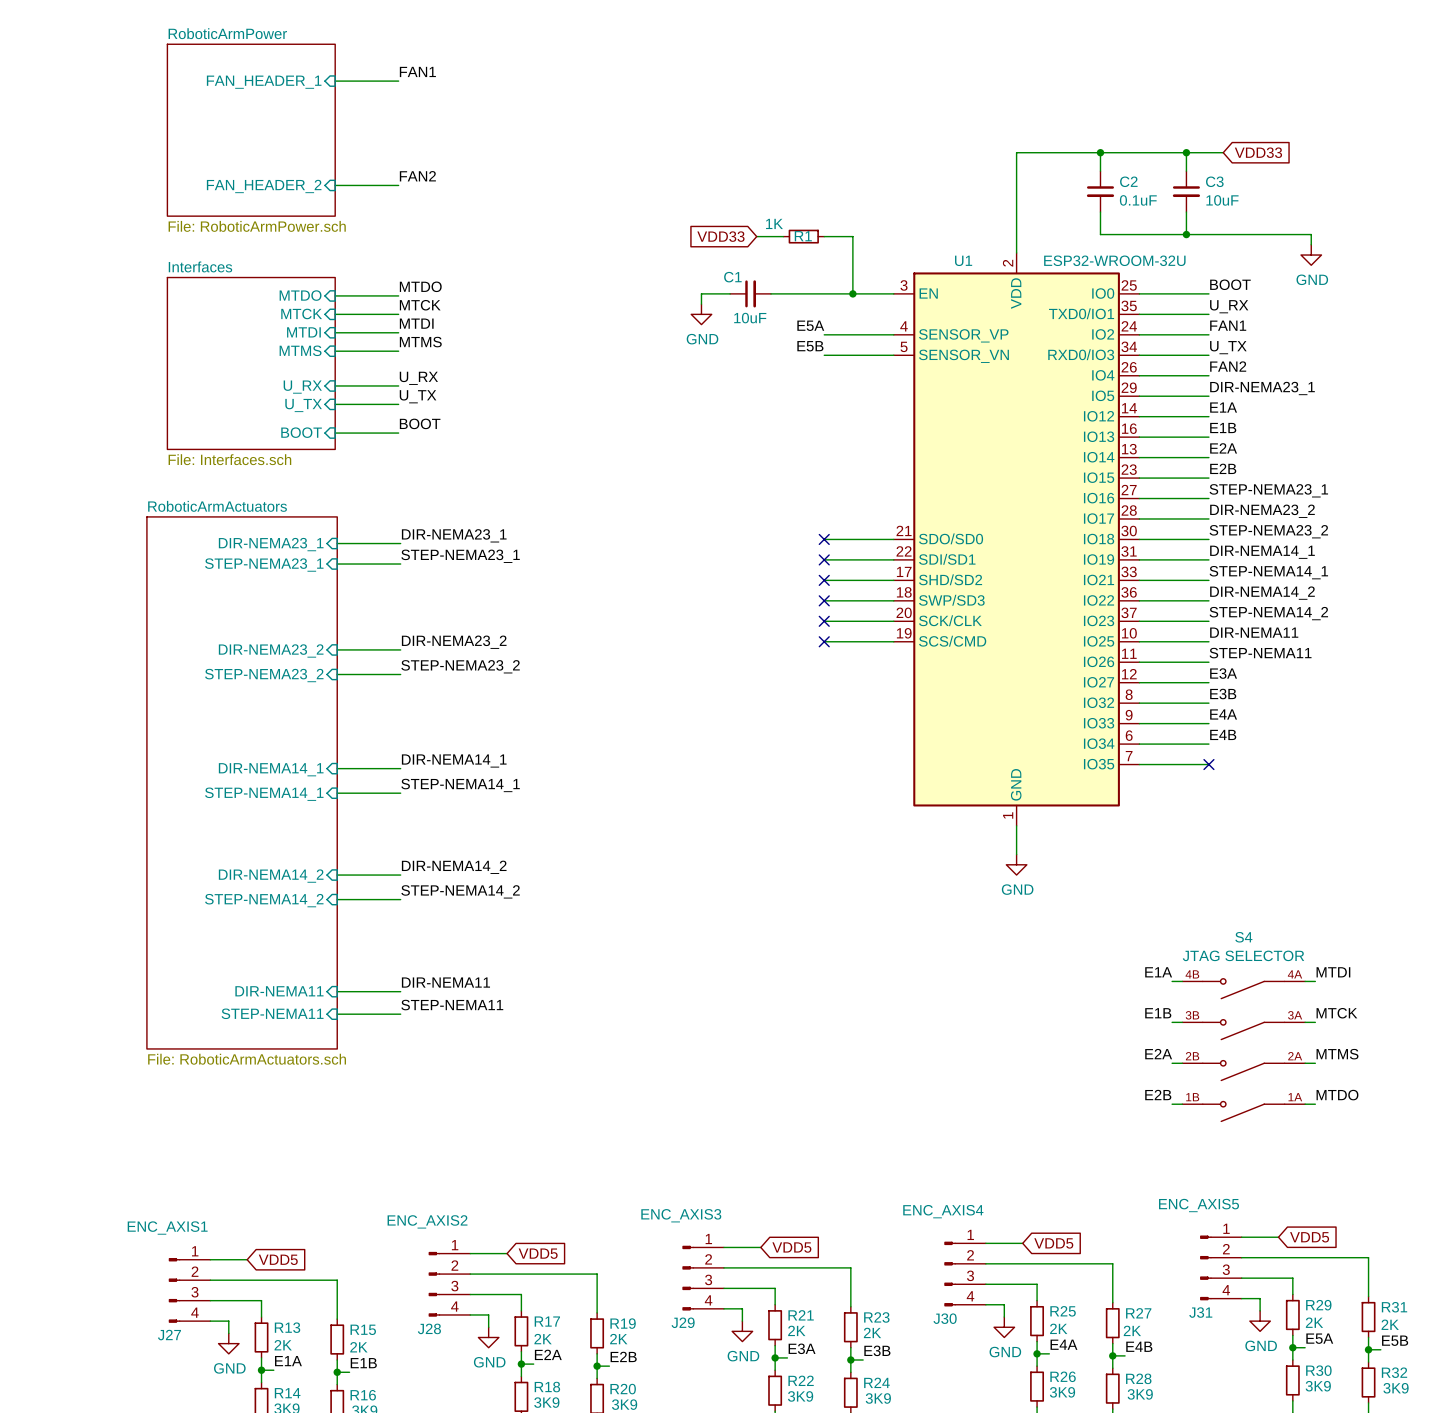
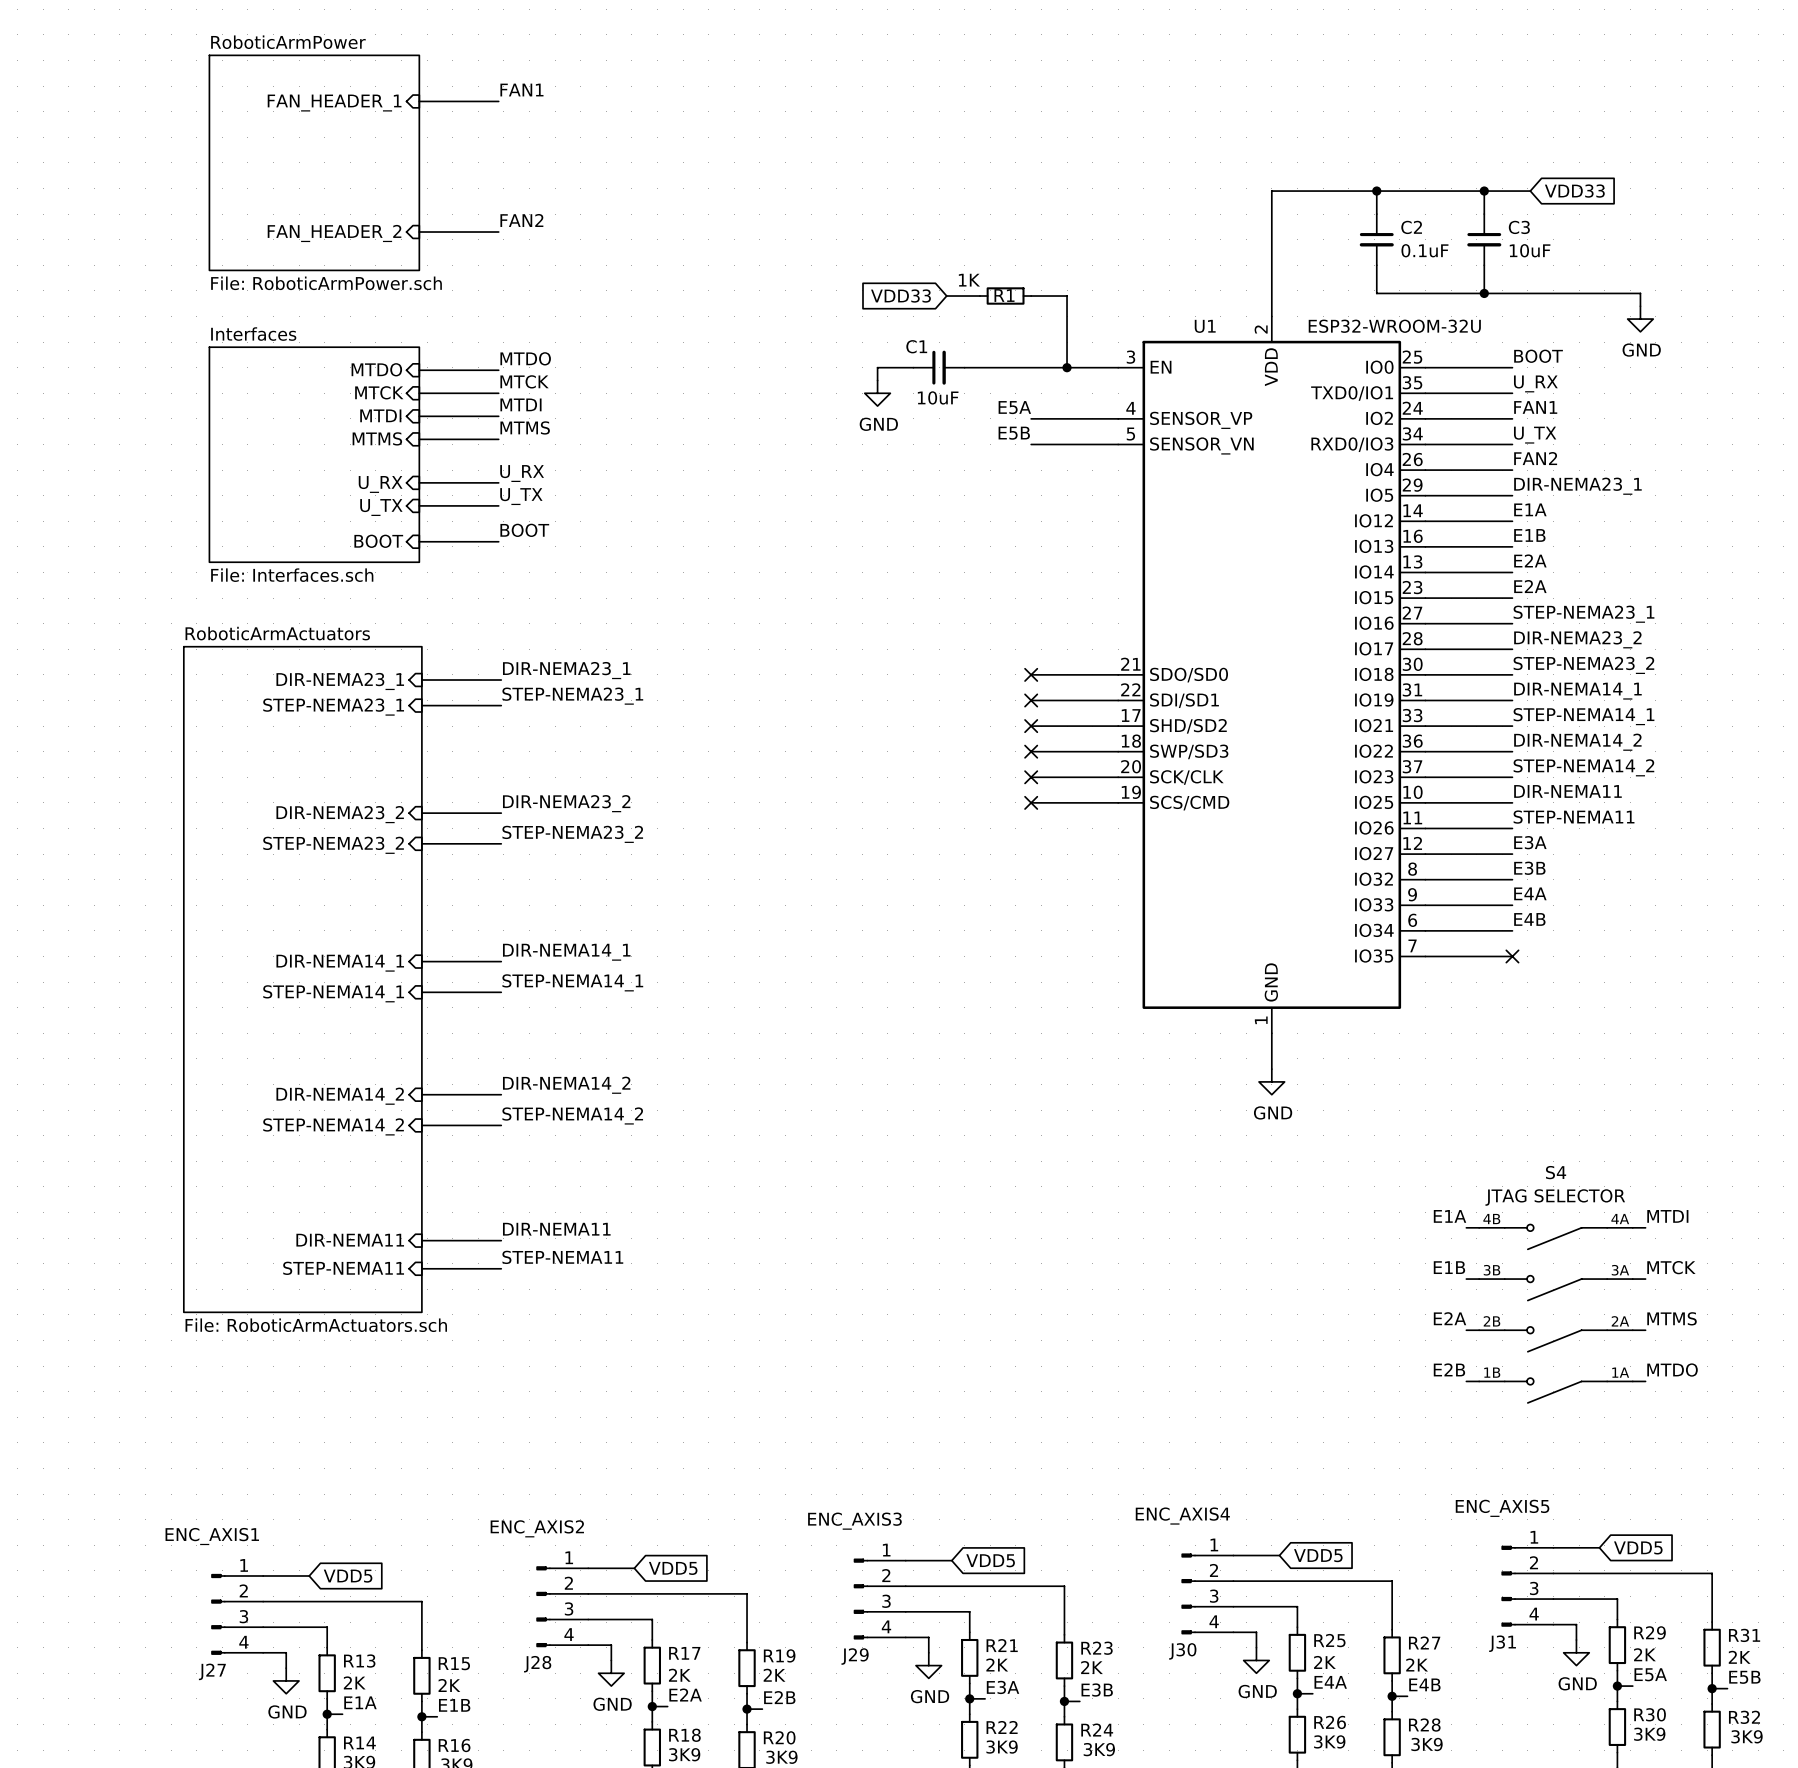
label: E2B (1223, 468) -> E2A (1530, 586)

